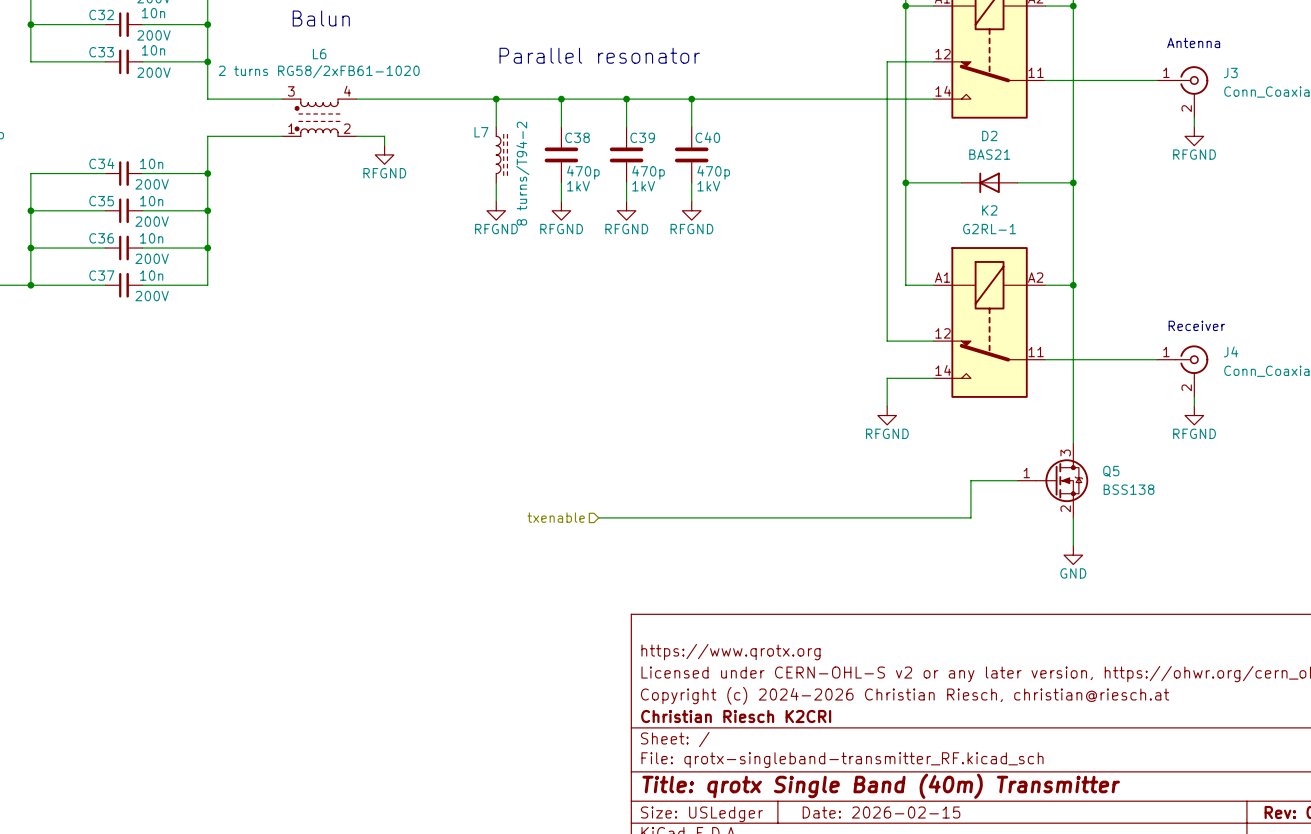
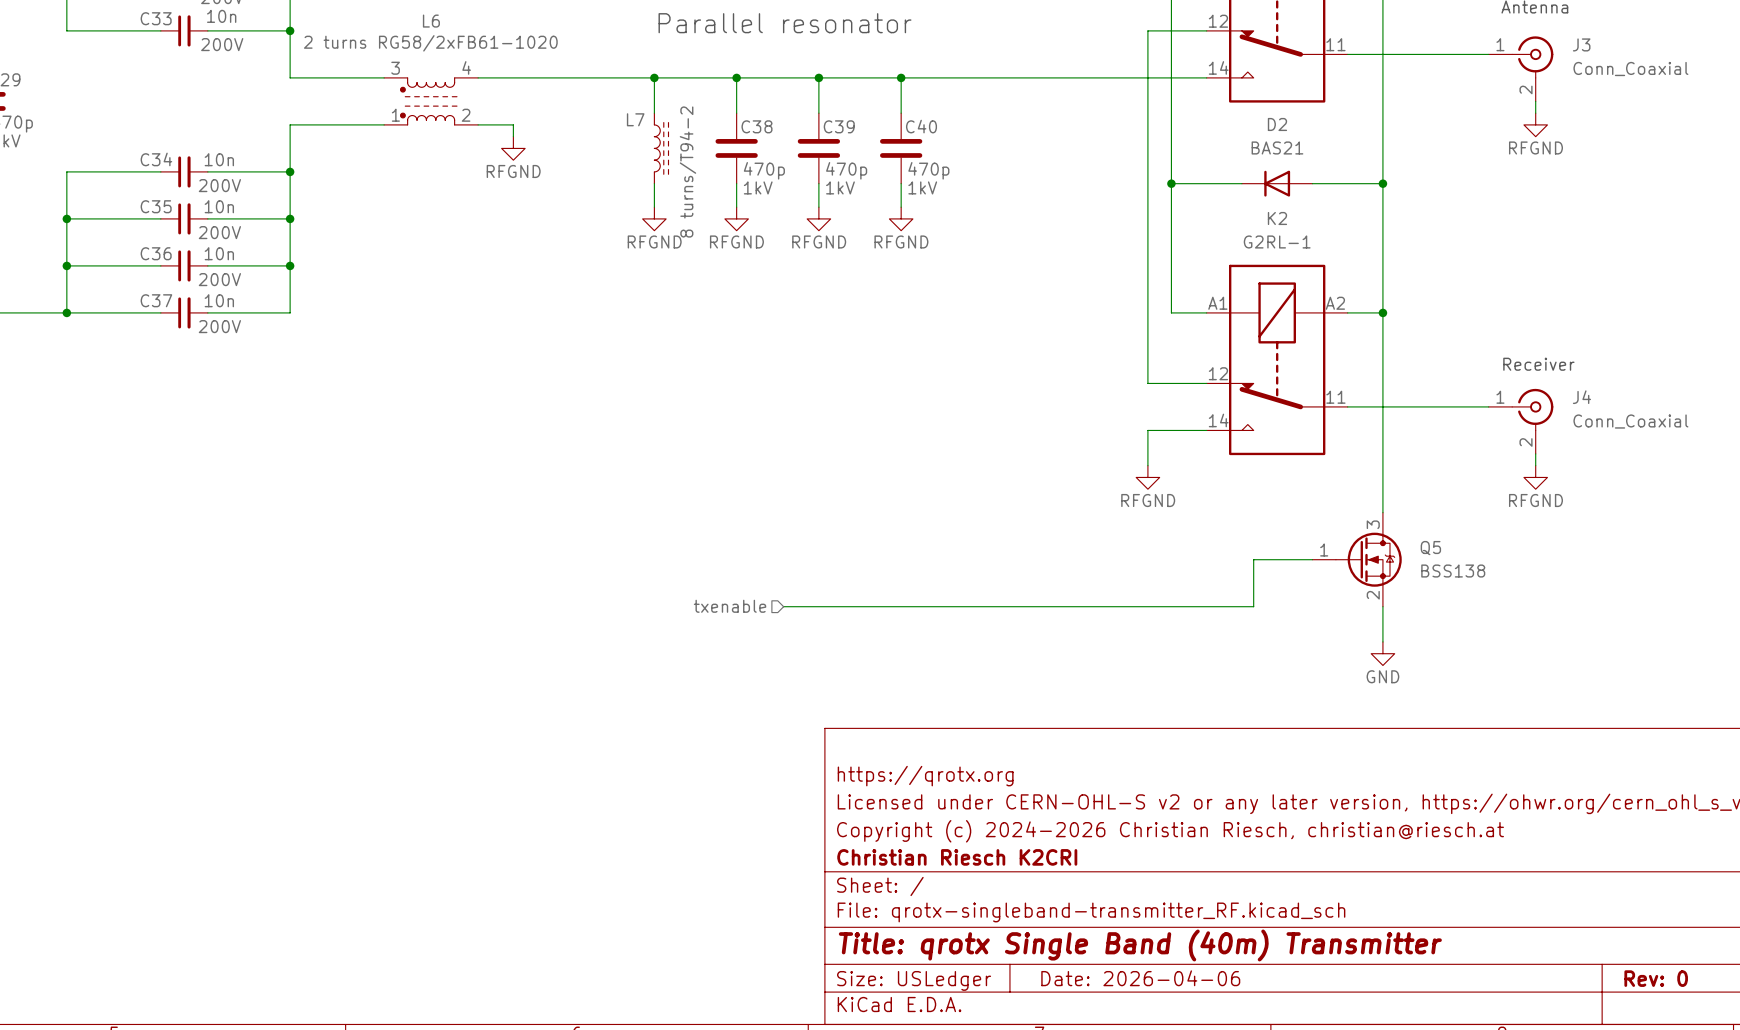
title block: https://www.qrotx.org (731, 652) -> https://qrotx.org (925, 776)
title block: Date: 2026-02-15 (881, 812) -> Date: 2026-04-06 (1140, 978)

